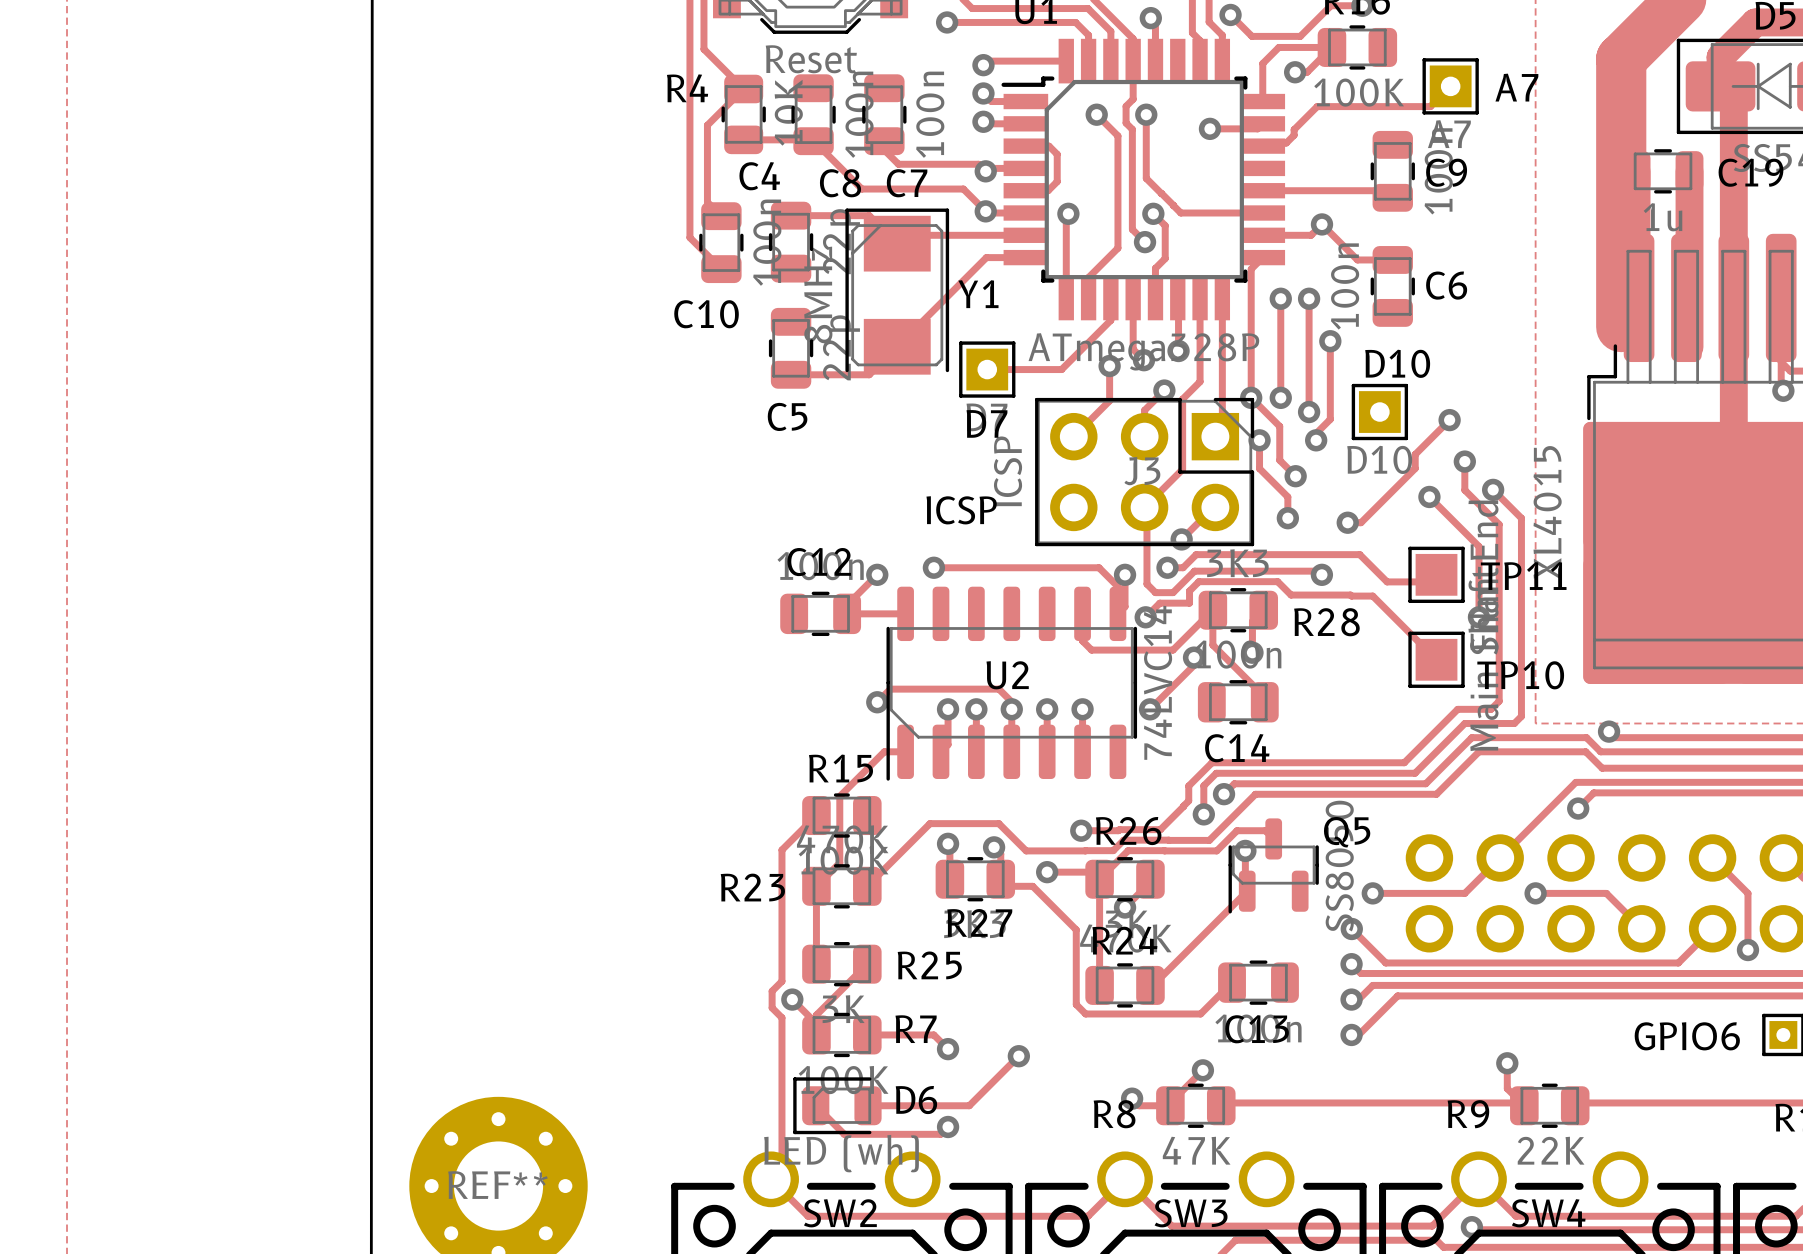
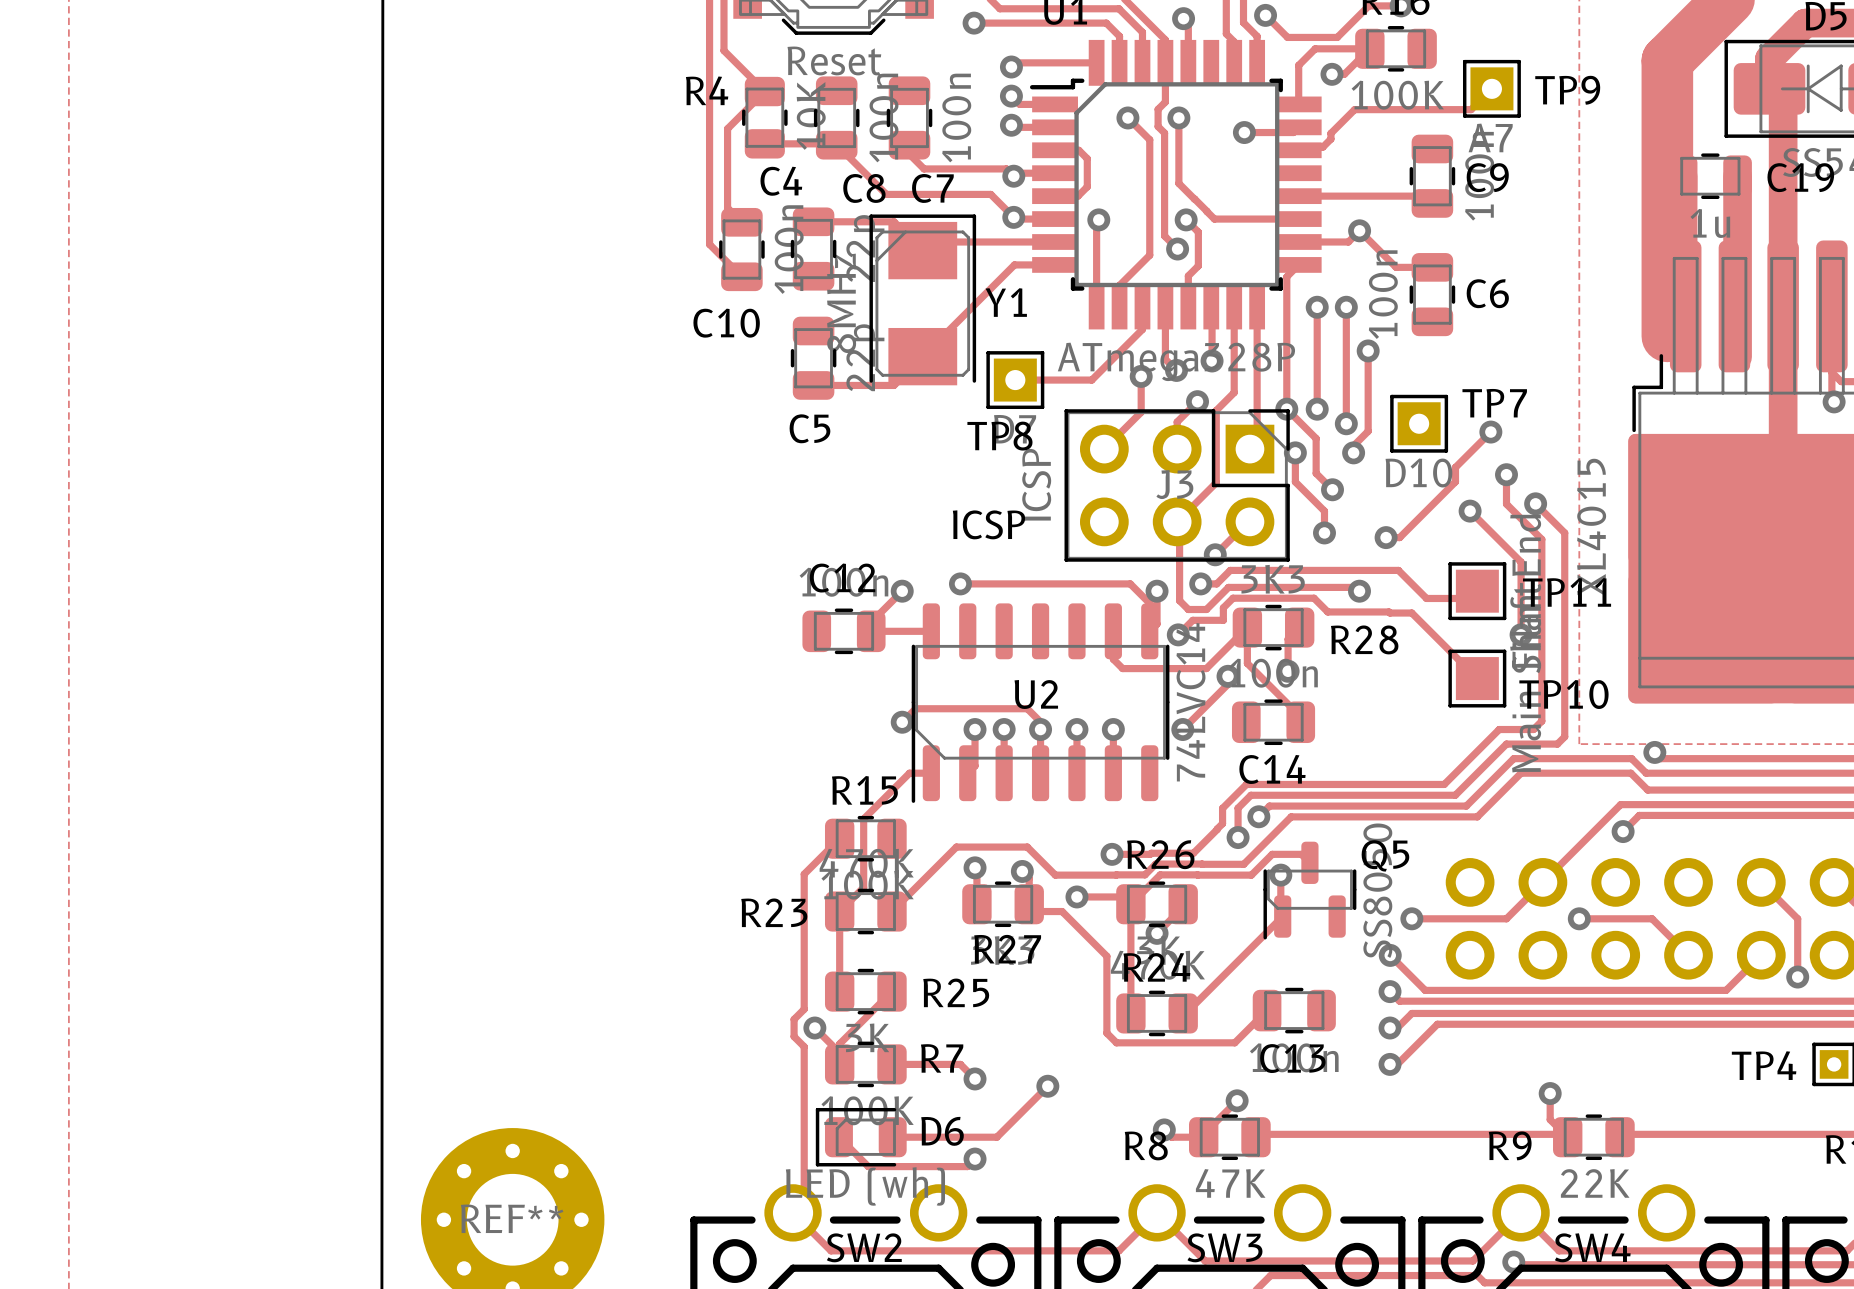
A7 name: A7 (1516, 87) -> TP9 (1567, 90)
D10 name: D10 (1397, 363) -> TP7 (1494, 403)
D7 name: D7 (986, 423) -> TP8 (999, 436)
GPIO6 name: GPIO6 (1687, 1036) -> TP4 (1764, 1065)

